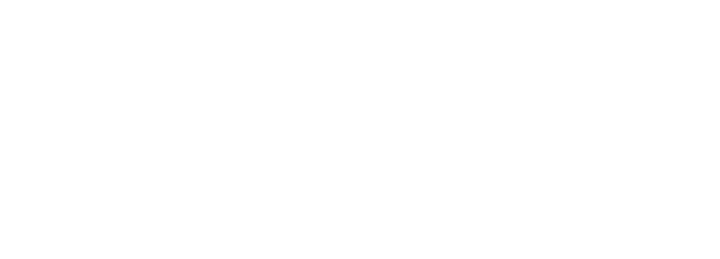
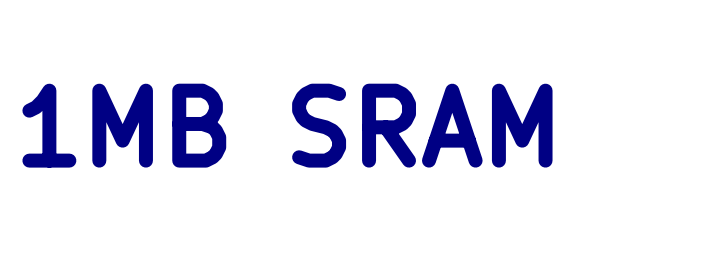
text: none -> 1MB SRAM (287, 125)

